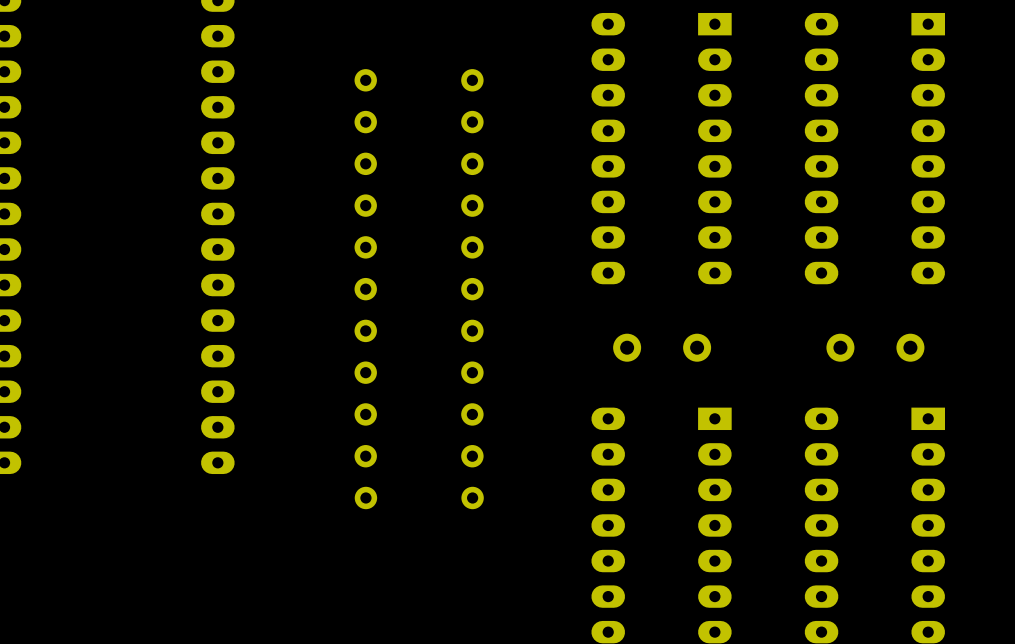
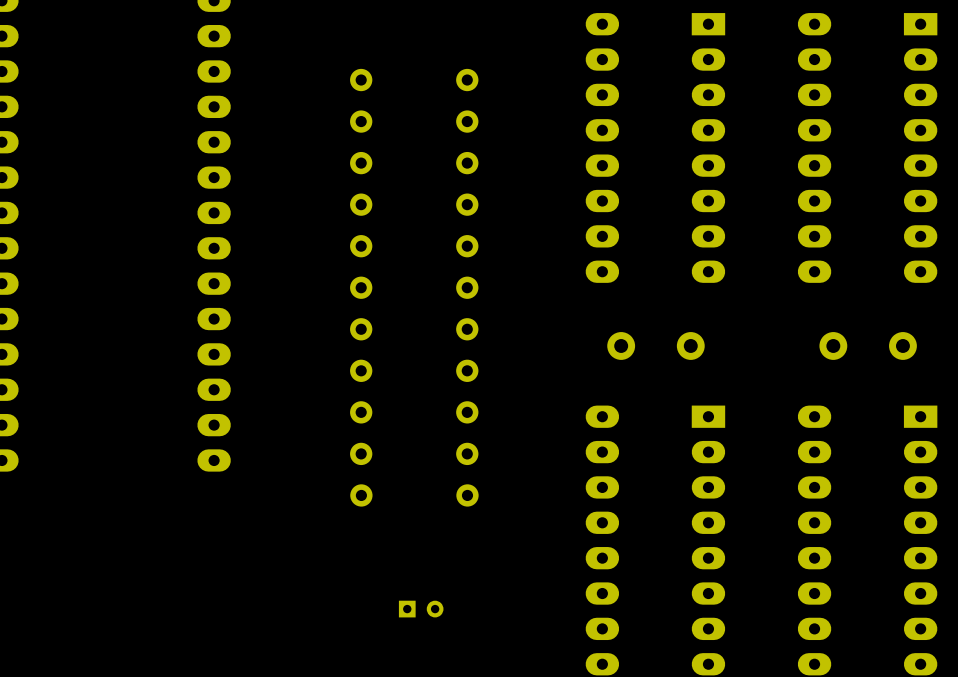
part: none -> (421, 609)

